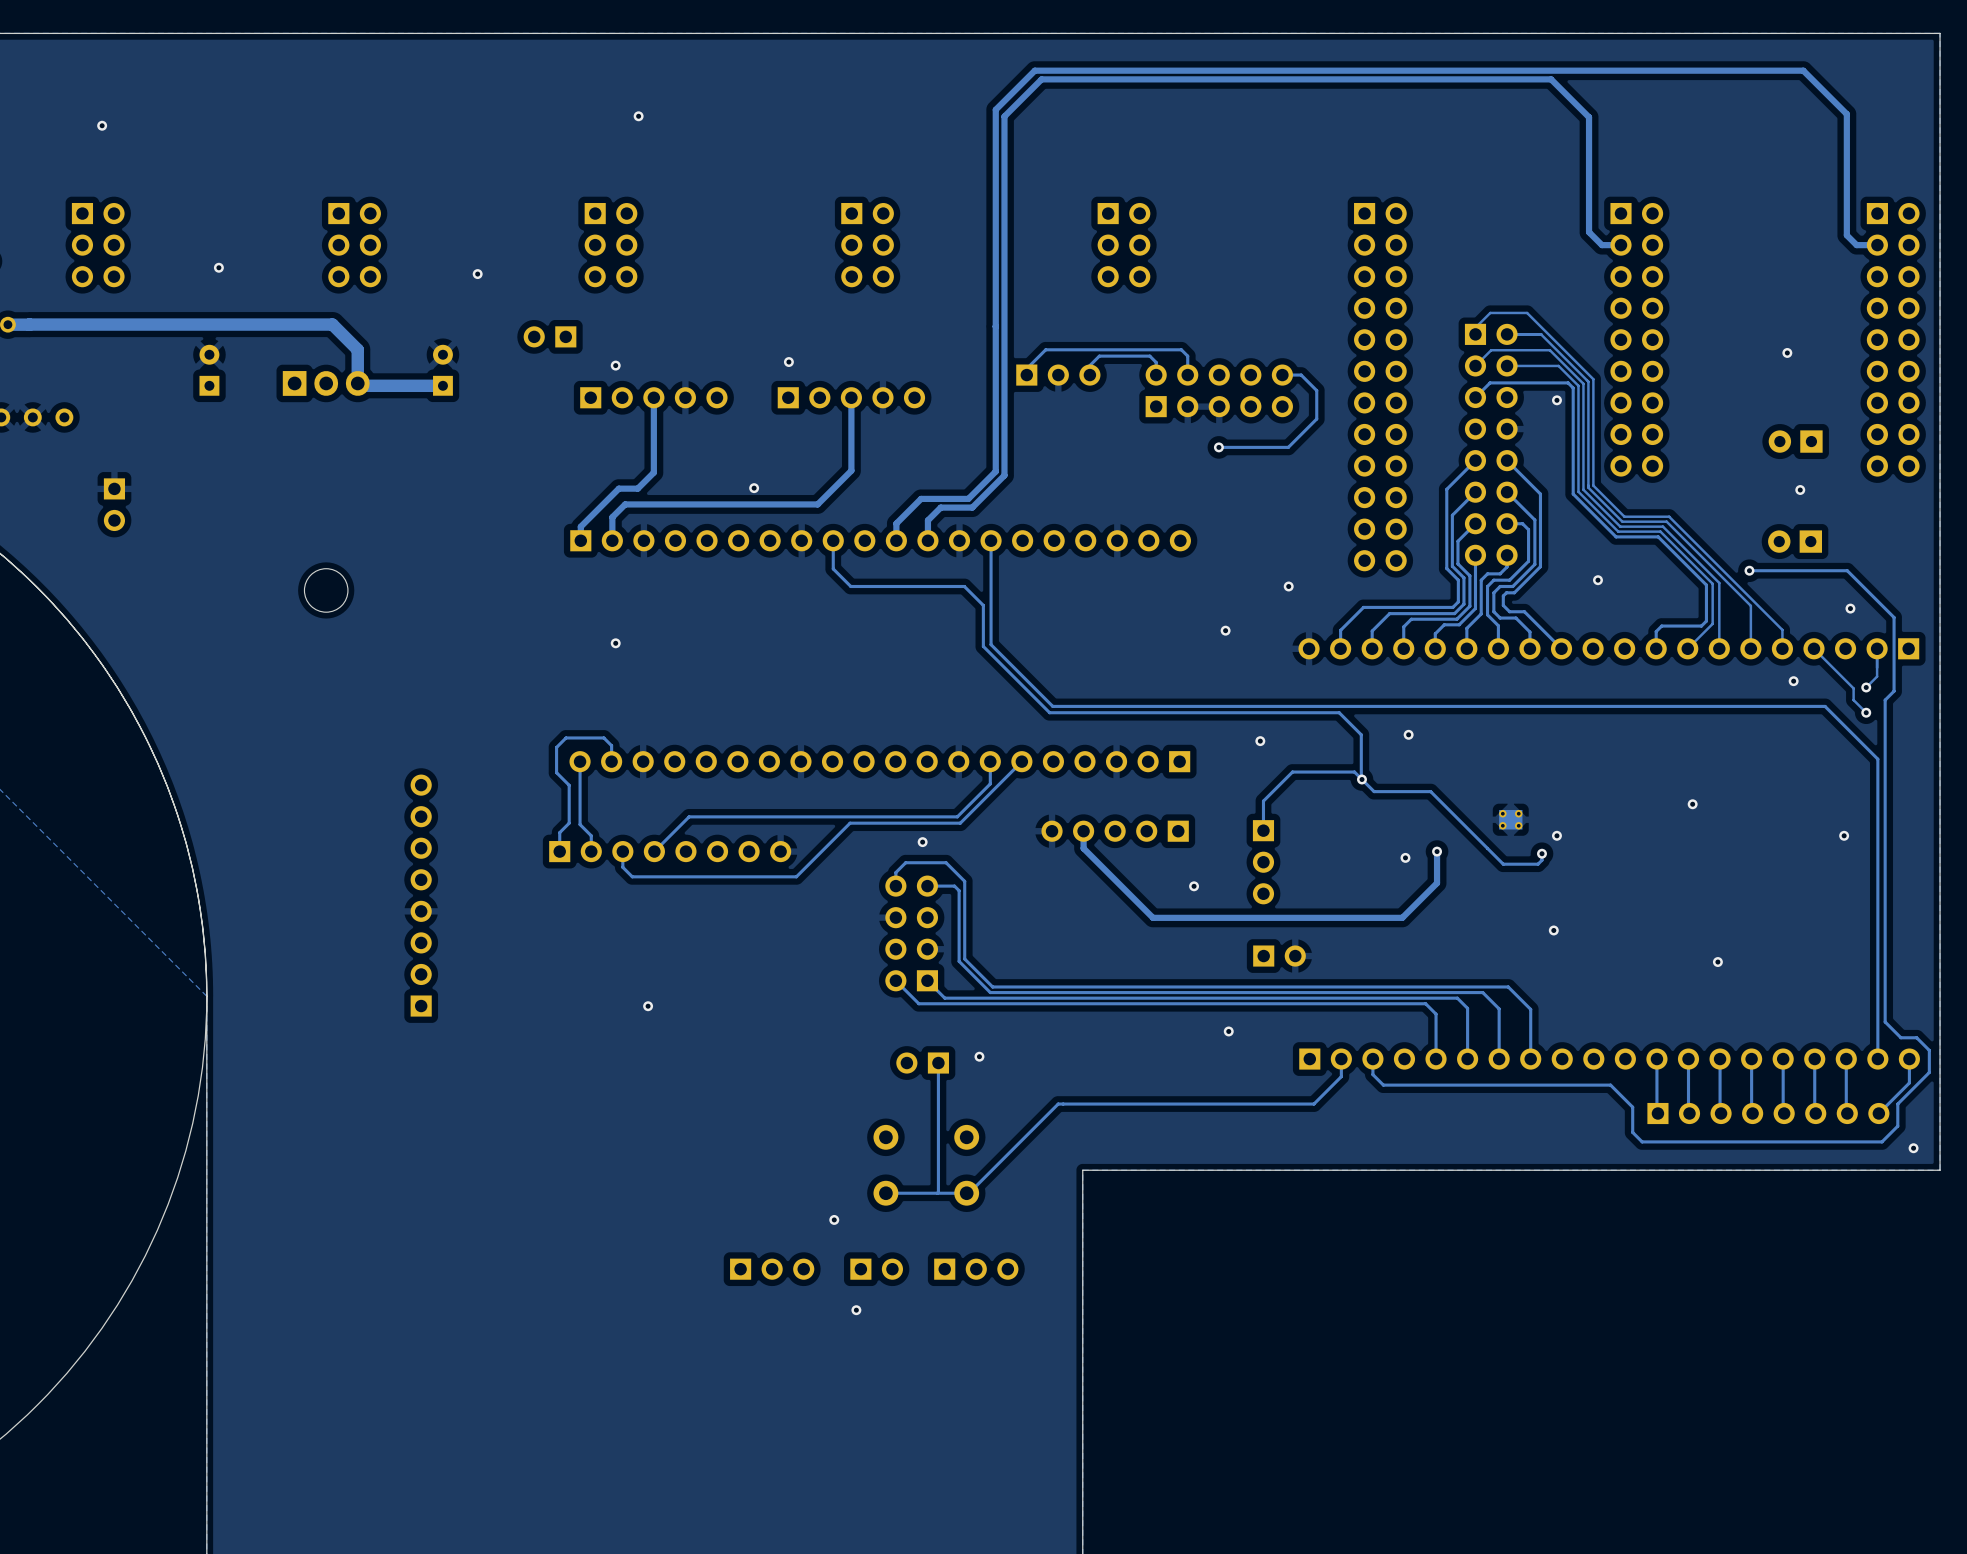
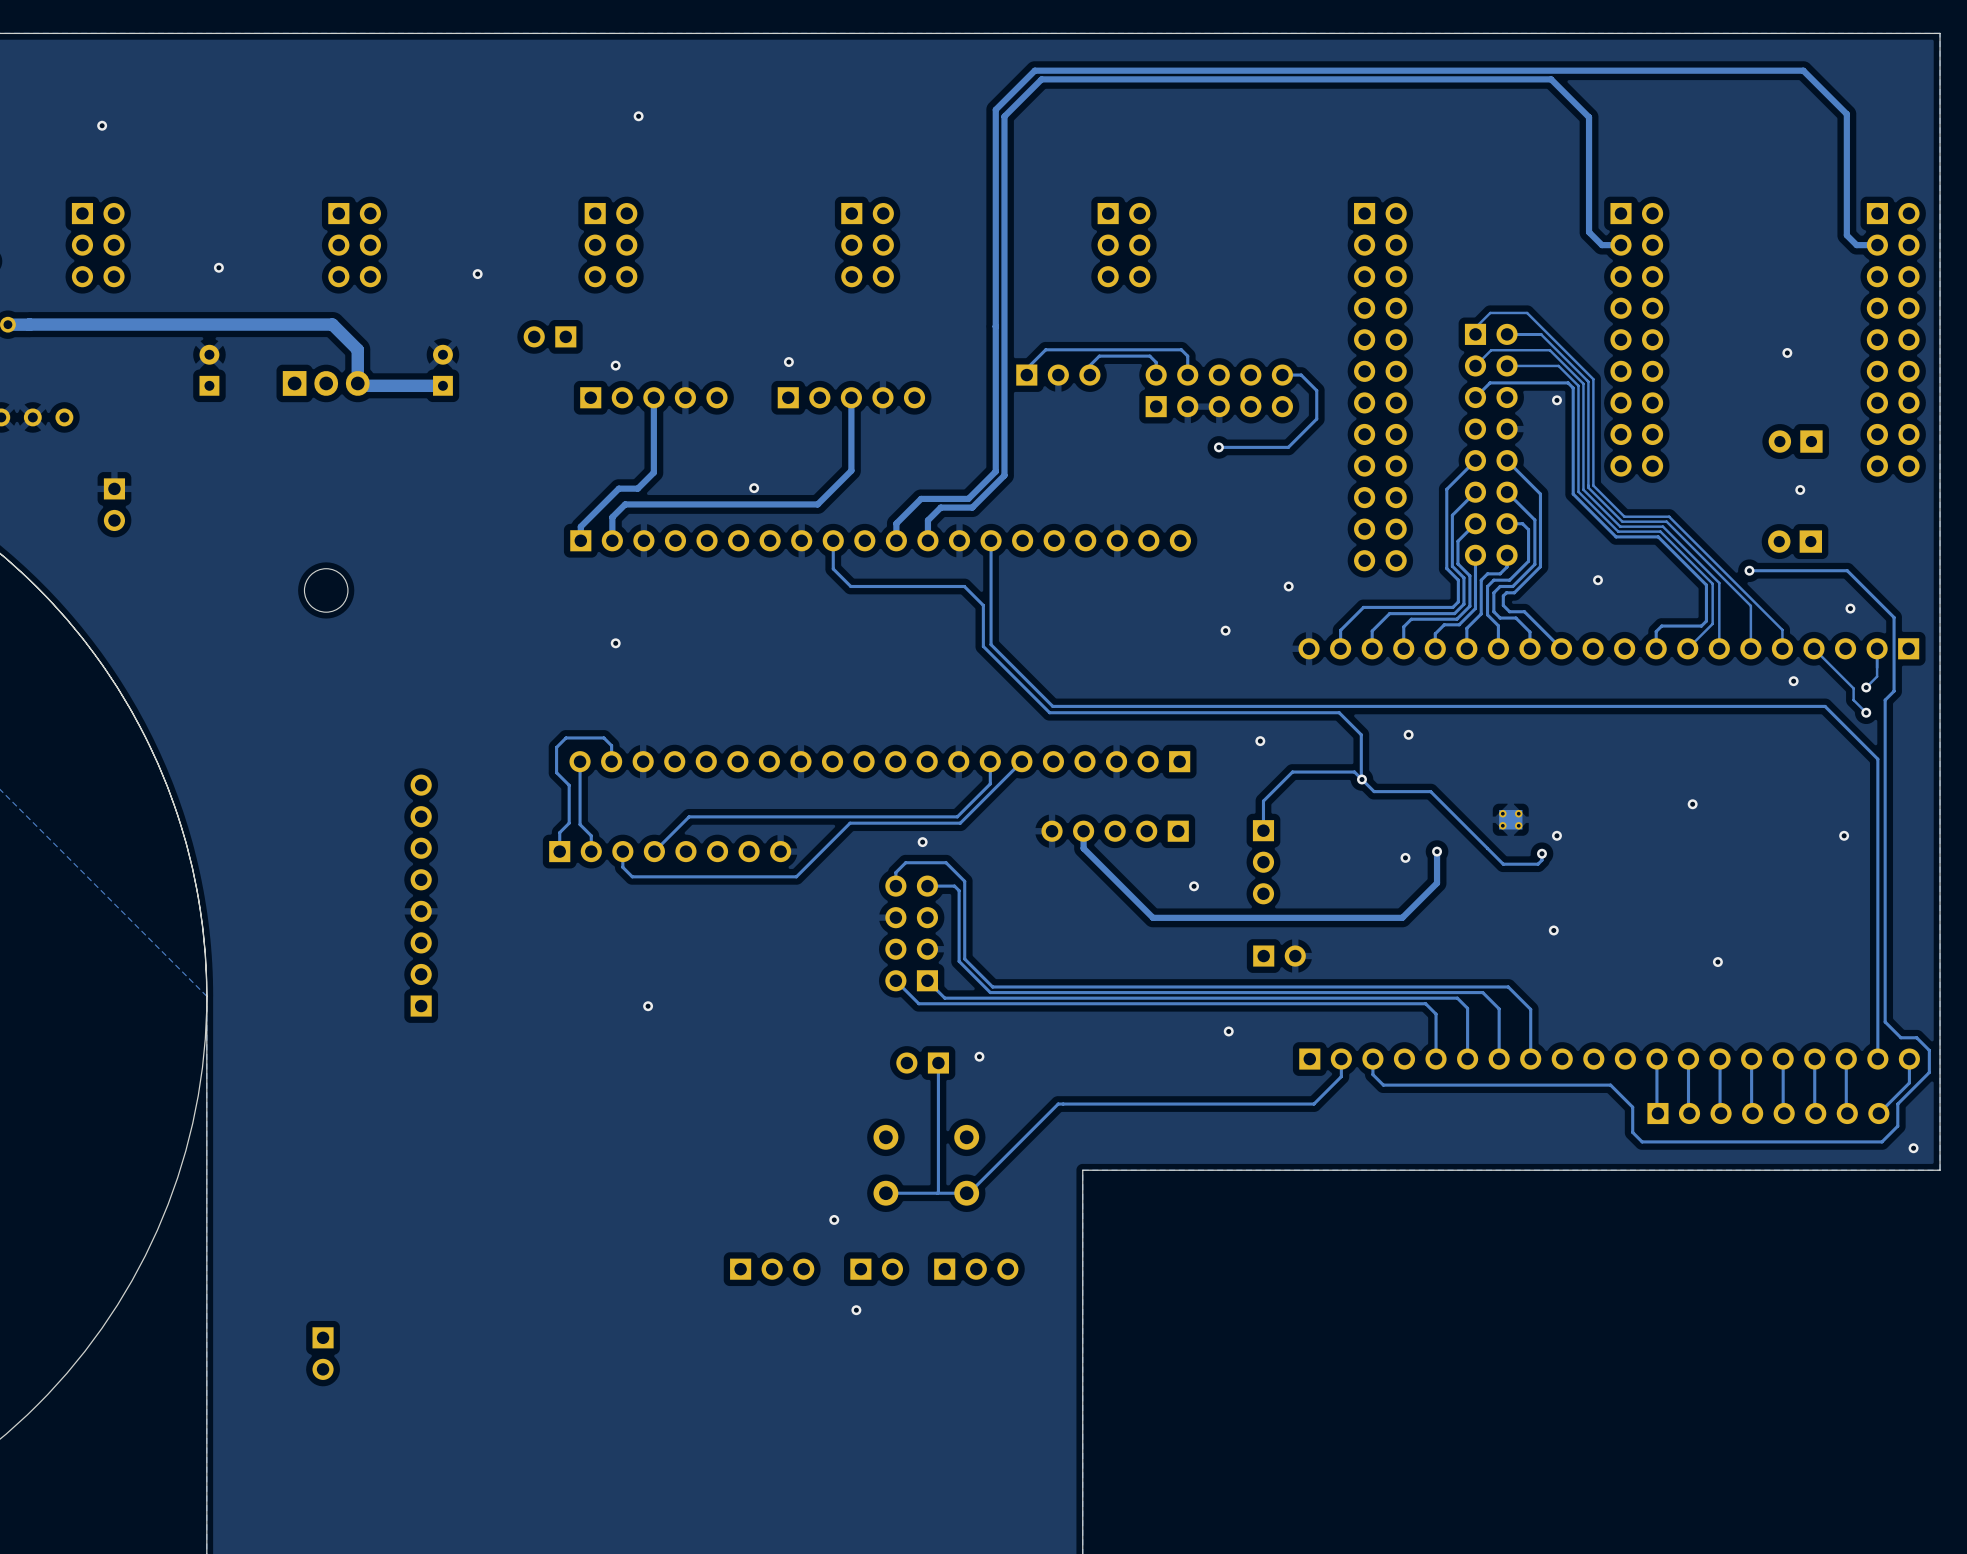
part: none -> (323, 1353)

